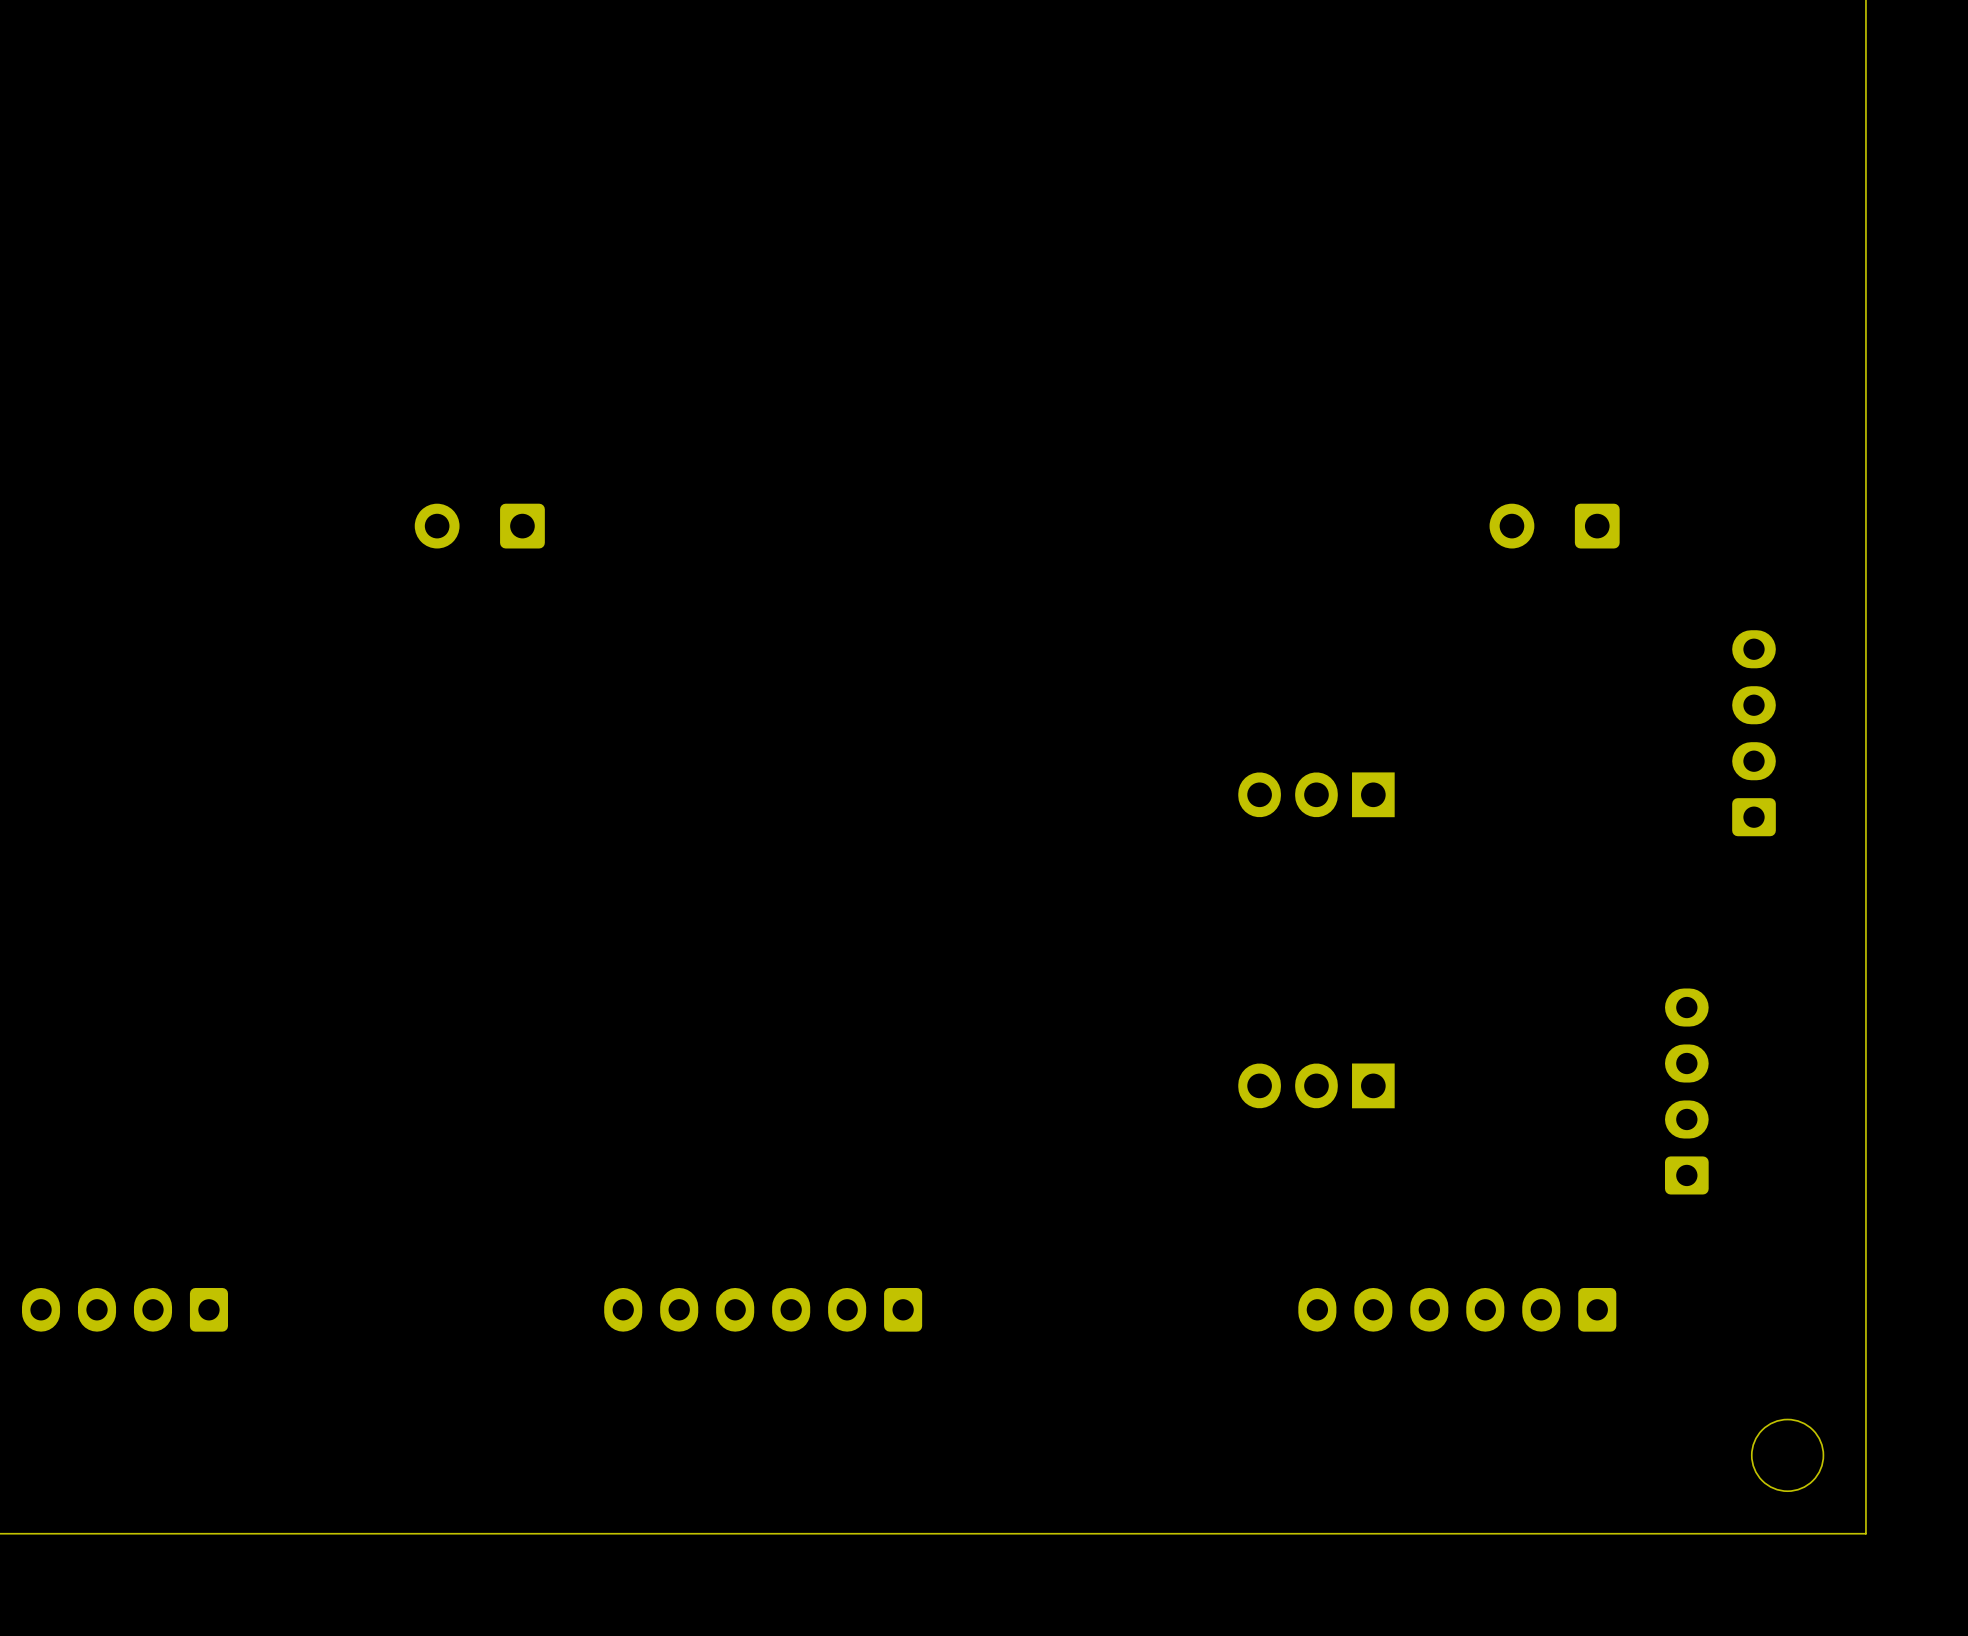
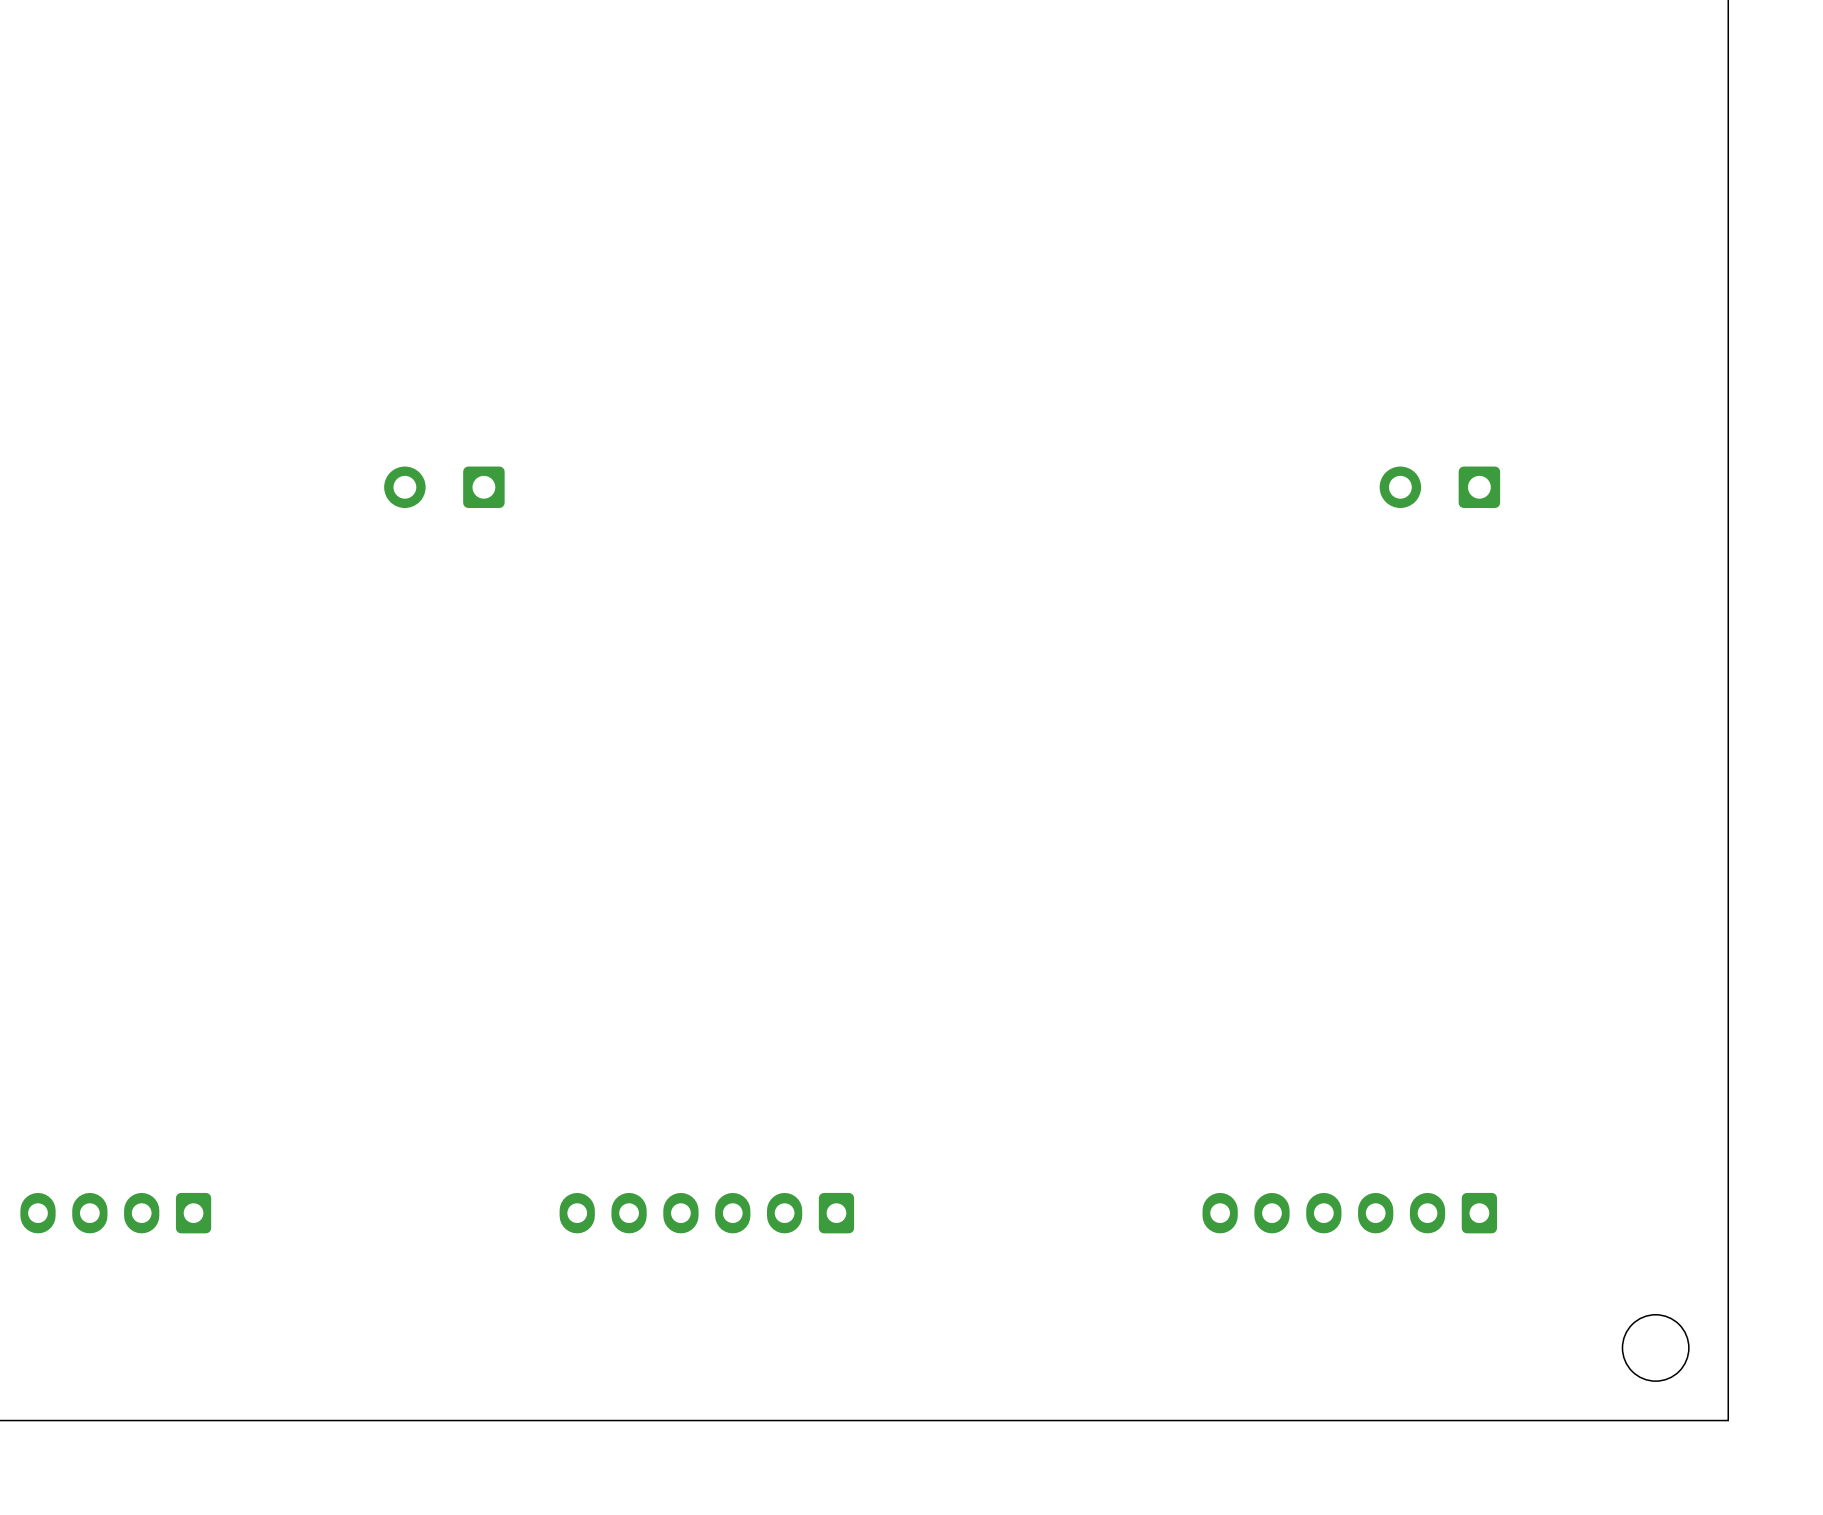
part: (1754, 733) -> none
part: (1316, 794) -> none
part: (1316, 1085) -> none
part: (1686, 1091) -> none

